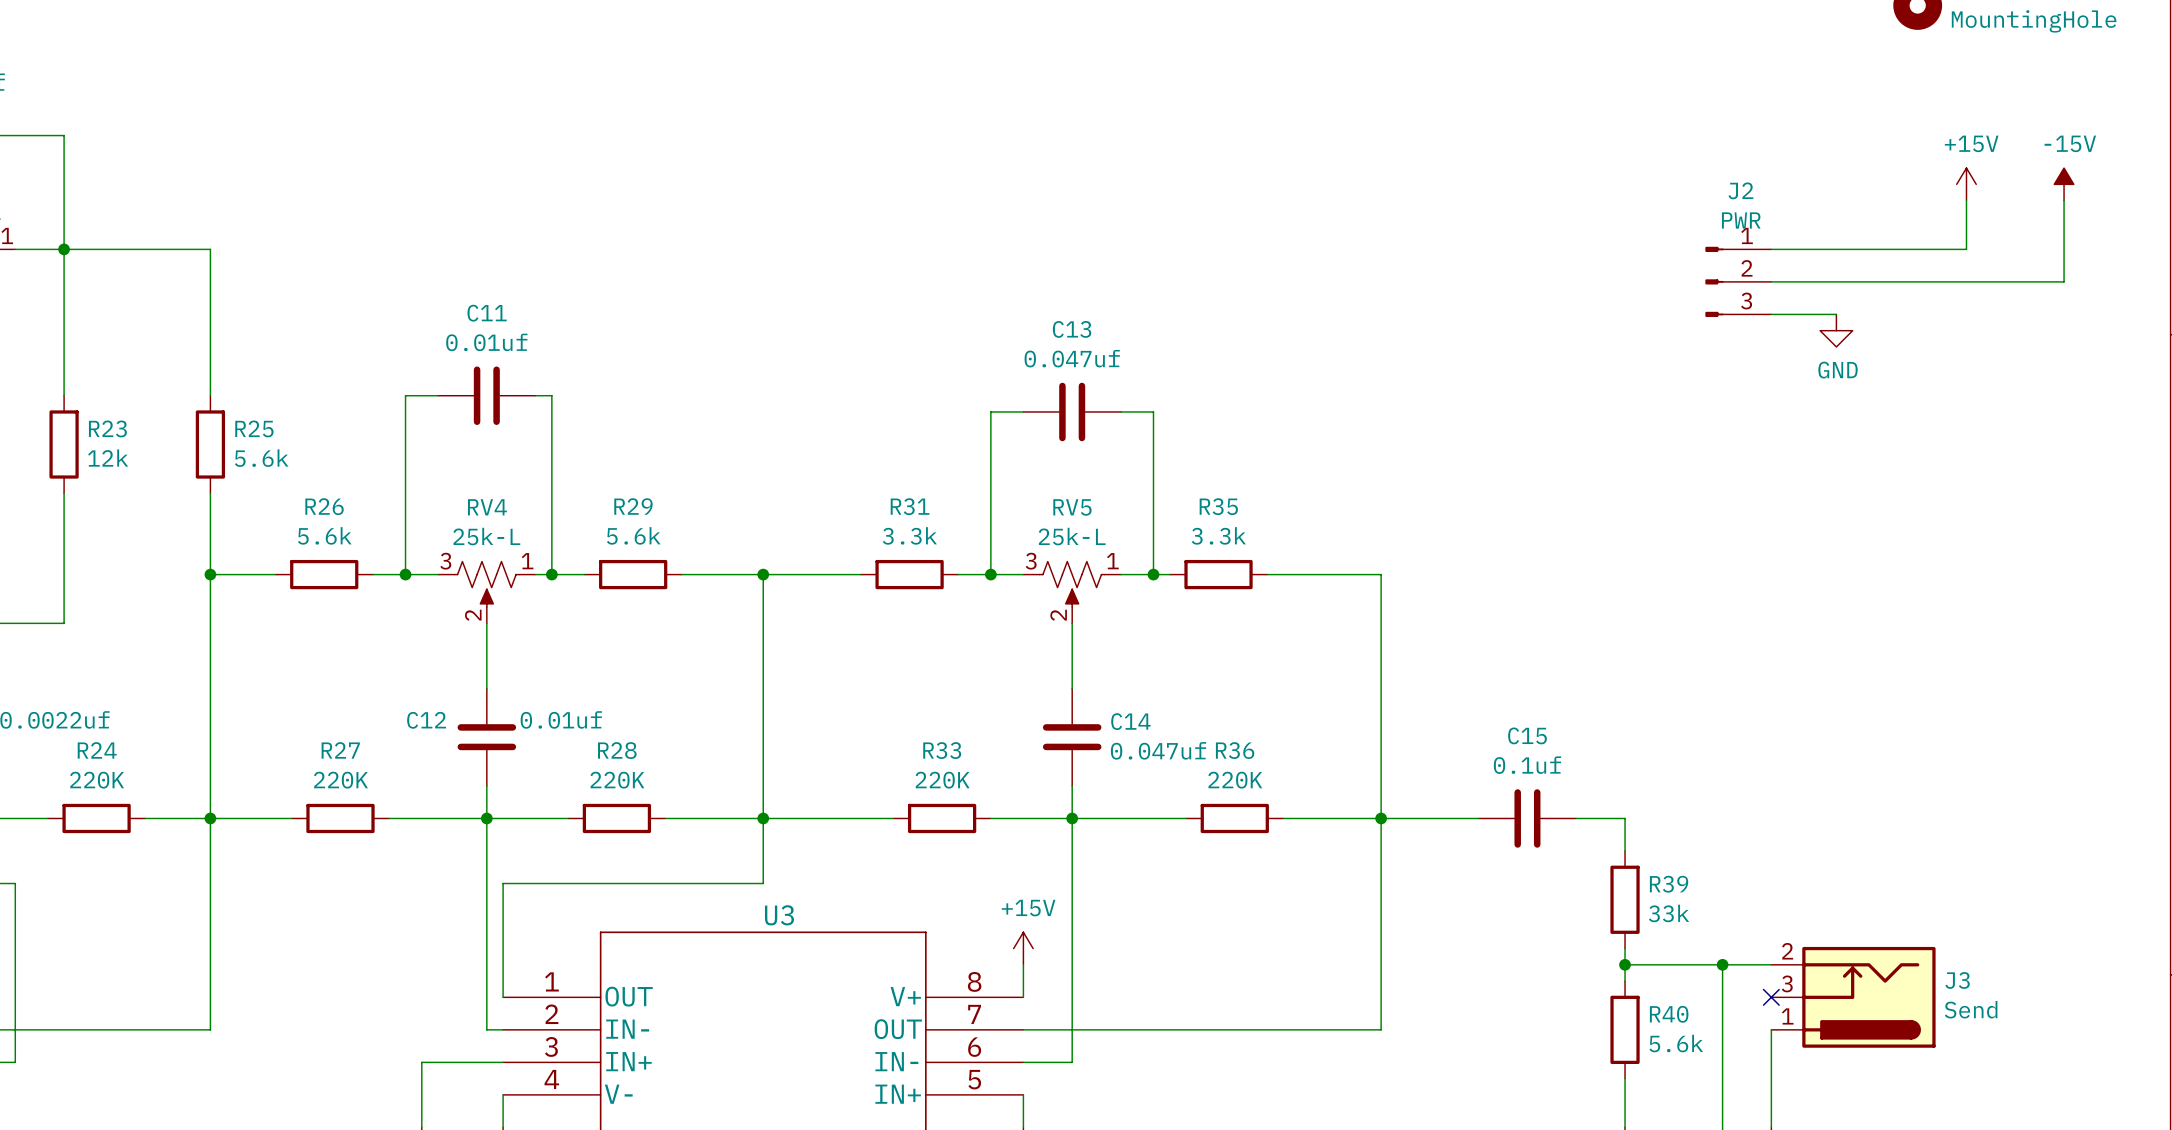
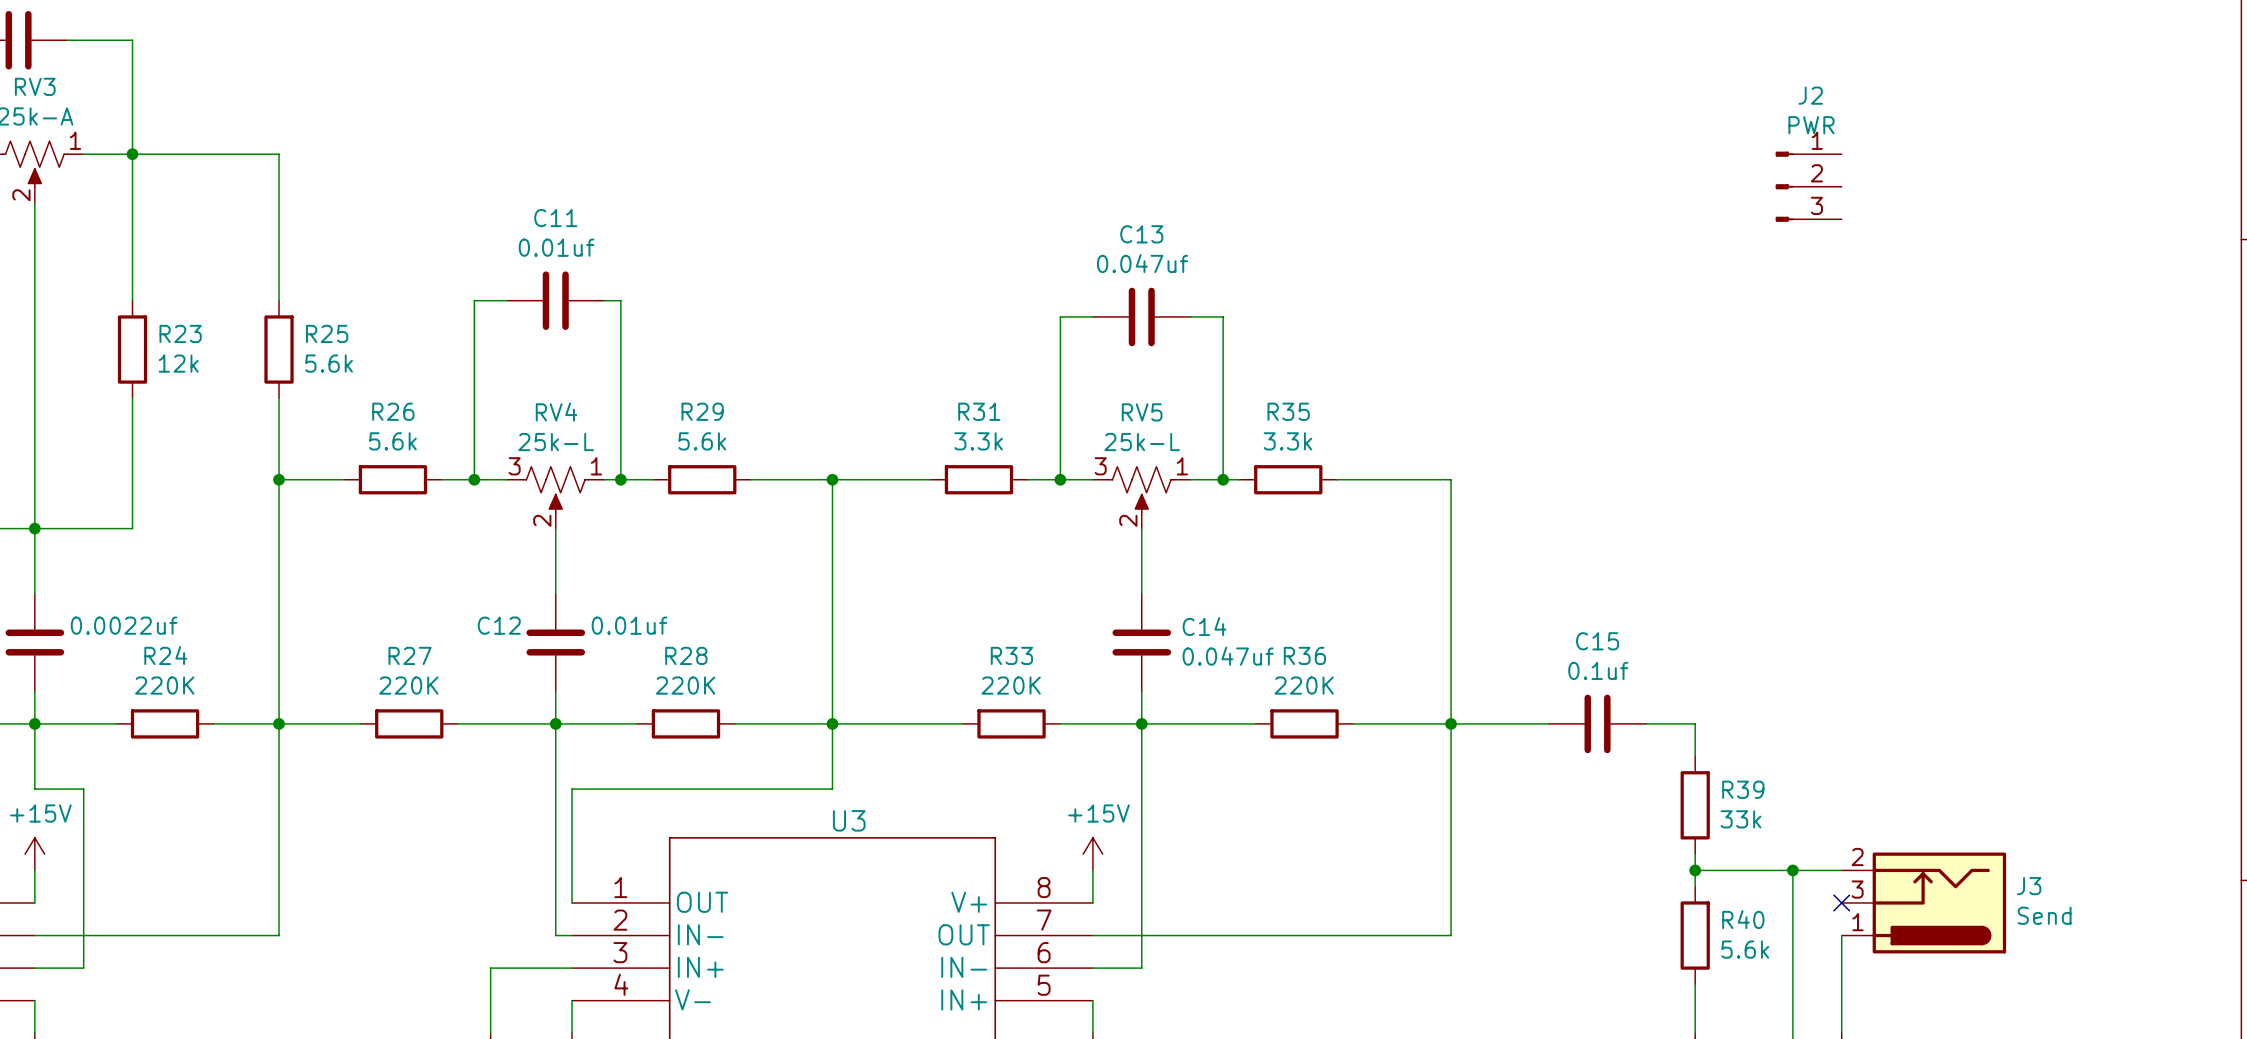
power symbol: +15V (1966, 184) -> none
power symbol: -15V (2064, 184) -> none
wire: (1966, 200) (1966, 249) (1771, 249) -> none
wire: (2064, 200) (2064, 281) (1771, 281) -> none
wire: (1771, 314) (1836, 314) -> none
power symbol: GND (1836, 330) -> none

